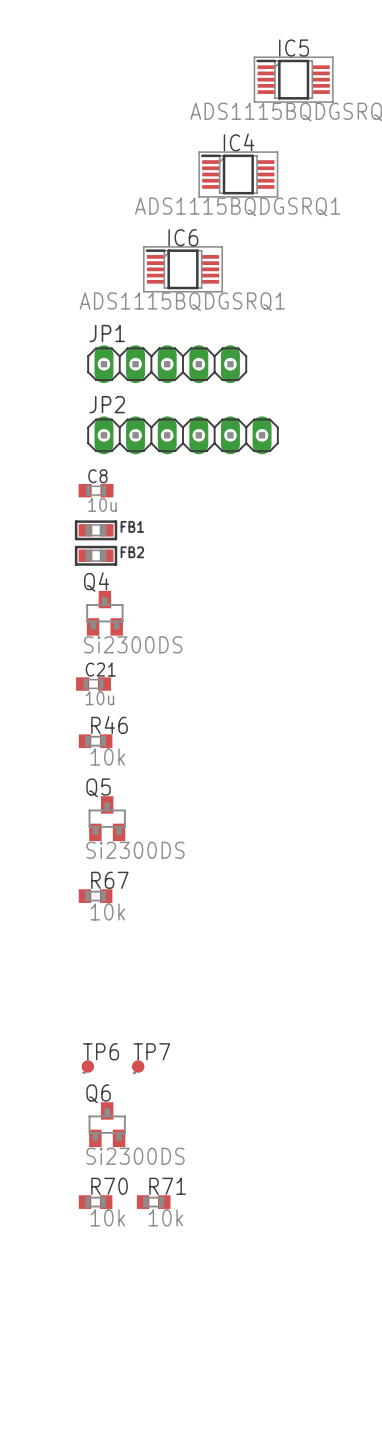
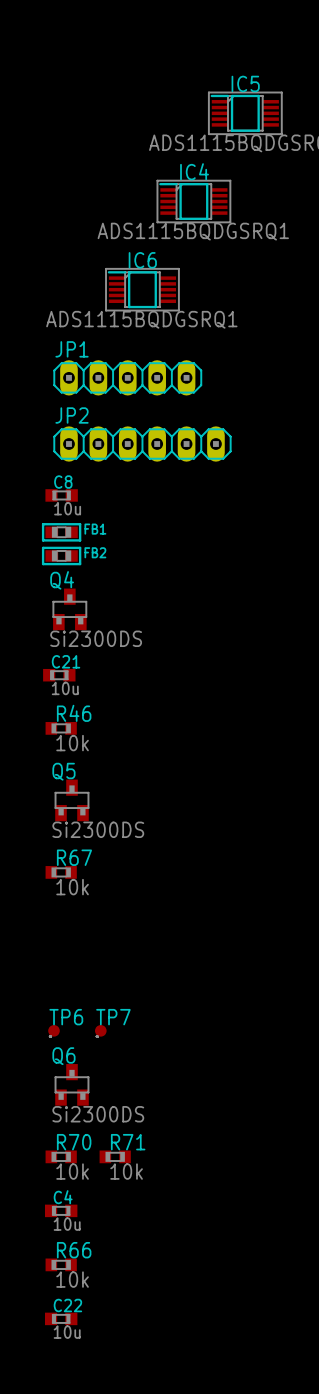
C4: none -> 10u (61, 1210)
R66: none -> 10k (61, 1264)
C22: none -> 10u (61, 1318)

